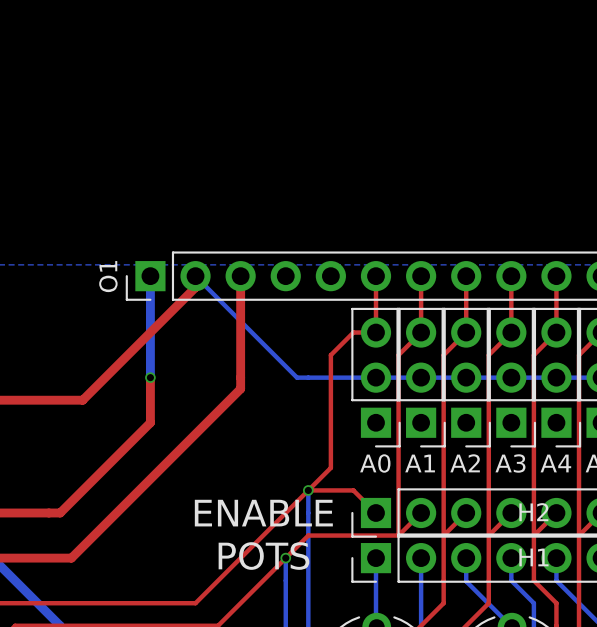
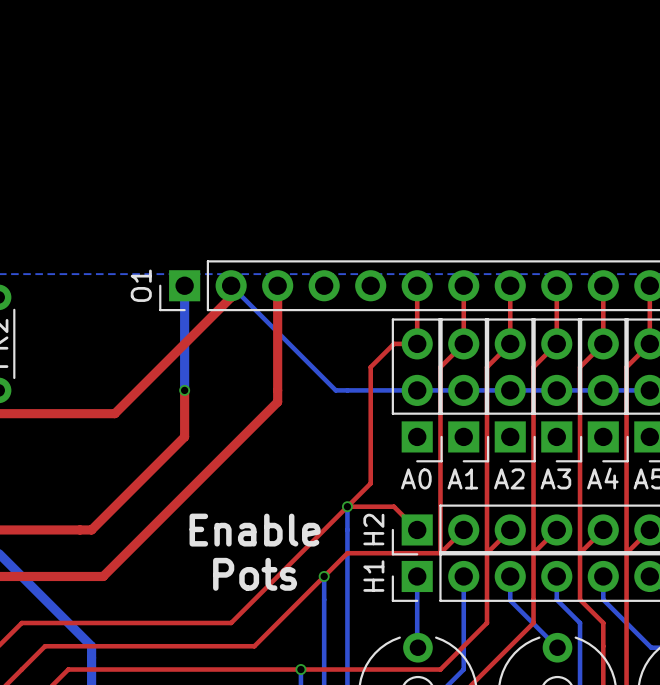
text: none -> Enable (255, 530)
H2 name rotation: 0° (533, 512) -> 90° counterclockwise (373, 529)
H2 name position: H2 (533, 512) -> H2 (373, 529)
text: ENABLE (263, 513) -> none
text: none -> Pots (255, 574)
text: POTS (263, 556) -> none
H1 name rotation: 0° (533, 557) -> 90° counterclockwise (373, 576)
H1 name position: H1 (533, 557) -> H1 (373, 576)

